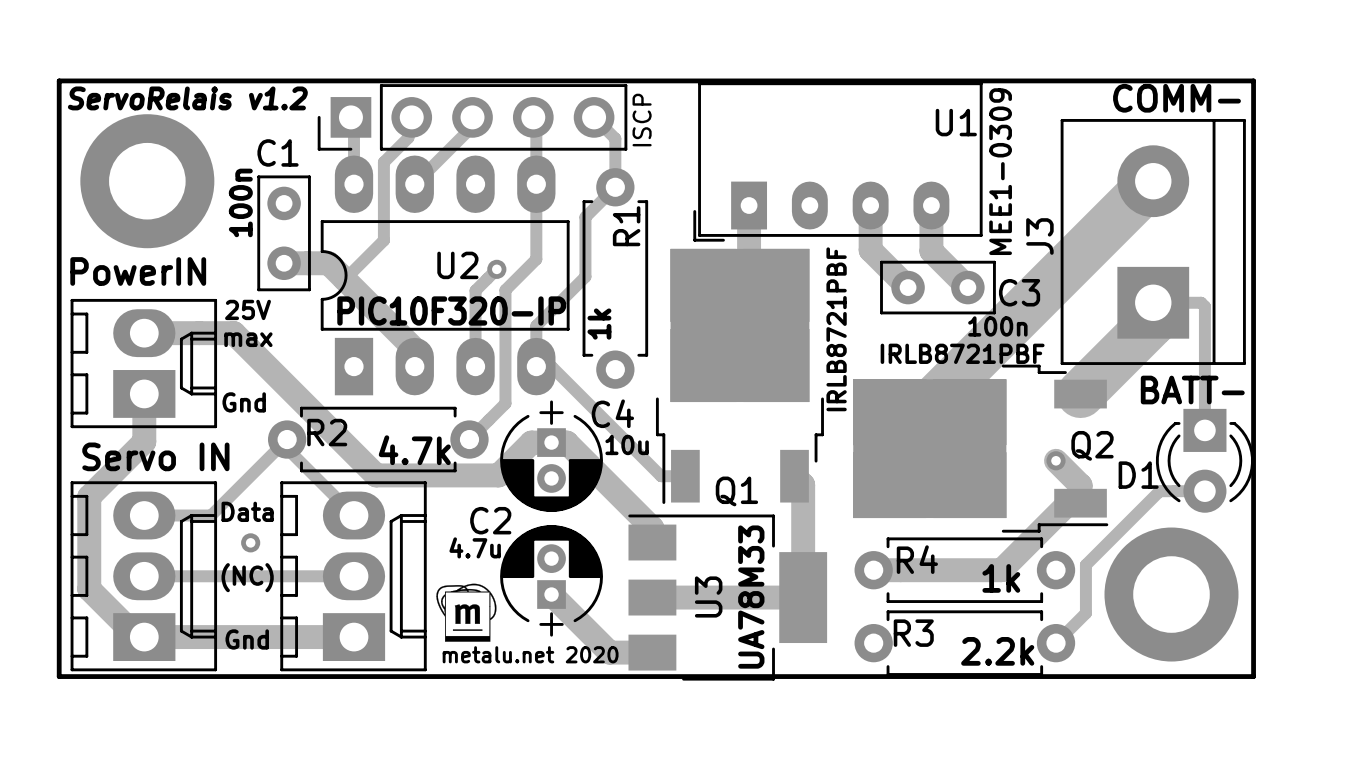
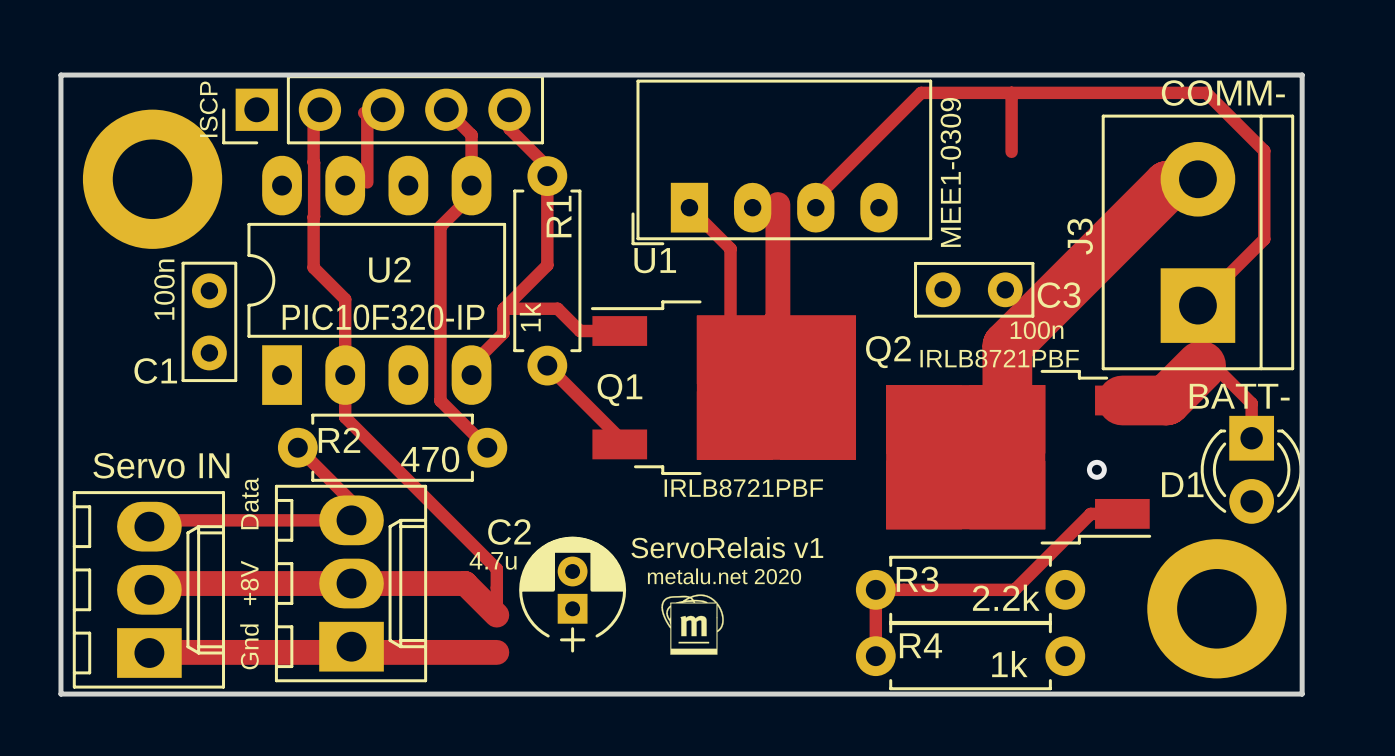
text: ServoRelais v1.2 (187, 98) -> none
track: none -> (1011, 92) (1011, 151)
track: none -> (319, 109) (313, 116) (313, 267) (345, 299) (345, 417) (496, 568) (496, 615) (465, 583) (155, 583)
track: none -> (509, 109) (509, 128) (547, 166) (547, 265) (503, 308) (557, 308) (579, 331) (619, 331)
track: (411, 117) (408, 120) (408, 137) (383, 162) (383, 240) (344, 279) -> none
track: (472, 117) (472, 126) (414, 184) -> none
part position: (472, 117) -> (383, 109)
track: (533, 117) (536, 120) (536, 259) (505, 290) (505, 403) (469, 439) -> (446, 109) (471, 135) (471, 195) (440, 226) (440, 400) (487, 447)
track: (594, 117) (615, 138) (615, 187) (585, 217) (585, 276) (536, 325) (536, 366) (551, 366) (661, 476) (685, 476) -> none
part value position: ISCP (642, 120) -> ISCP (208, 109)
U1 name position: U1 (956, 122) -> U1 (655, 260)
C1 name position: C1 (278, 152) -> C1 (155, 370)
U1 position: (837, 161) -> (781, 162)
track: (1153, 181) (929, 404) (929, 448) -> none
track: none -> (1201, 185) (1167, 185) (1007, 346) (1007, 419)
track: (870, 205) (870, 250) (908, 287) -> none
track: (931, 205) (931, 251) (967, 287) -> none
track: none -> (689, 207) (730, 248) (730, 341) (776, 387)
track: none -> (815, 207) (815, 198) (921, 92) (1206, 92) (1264, 150) (1264, 239) (1197, 305)
C1 position: (284, 233) -> (209, 321)
track: (284, 263) (328, 263) (414, 349) (414, 366) -> none
track: (496, 269) (475, 290) (475, 366) -> none
via: (496, 269) -> none
U2 position: (445, 275) -> (376, 280)
R1 position: (615, 278) -> (547, 270)
track: none -> (503, 309) (503, 333) (471, 365) (471, 375)
text: 25V (248, 309) -> none
track: (144, 333) (233, 333) (376, 475) (498, 475) (531, 442) (566, 442) (652, 528) (652, 542) -> none
text: max (248, 339) -> none
track: none -> (547, 365) (619, 438) (619, 444)
part: PowerIN (143, 363) -> none
Q1 rotation: 0° (739, 376) -> 90° clockwise (723, 387)
track: (144, 393) (144, 441) (89, 496) (89, 589) (137, 637) (353, 637) -> none
track: (1080, 394) (1153, 321) (1153, 302) (1201, 302) (1204, 306) (1204, 396) -> (1122, 400) (1166, 400) (1201, 365) (1213, 365) (1251, 403)
text: Gnd (244, 402) -> none
track: none -> (297, 447) (351, 501) (351, 520) (155, 520)
Q2 name position: Q2 (1092, 445) -> Q2 (888, 352)
R2 value: 4.7k (414, 450) -> 470 (430, 459)
C4: 10u (551, 456) -> none
track: (1056, 460) (1080, 485) (1080, 503) -> none
track: (794, 476) (803, 484) (803, 597) (652, 597) -> none
track: (1204, 491) (1159, 491) (1085, 564) (1085, 613) (1056, 643) -> none
track: (1068, 503) (1001, 570) (873, 570) -> (1109, 513) (1090, 513) (1014, 589) (875, 589) (875, 656)
text rotation: 0° (247, 511) -> 90° counterclockwise (249, 503)
track: (144, 515) (211, 515) (287, 439) (287, 448) (353, 515) -> none
text: none -> ServoRelais v1 (727, 547)
via: (250, 542) -> none
R4 position: (964, 570) -> (970, 656)
track: (144, 576) (353, 576) -> none
part position: (353, 576) -> (351, 583)
text: (NC) (247, 577) -> +8V (249, 582)
track: (551, 594) (609, 652) (652, 652) -> none
U3: UA78M33 (727, 597) -> none
drawing position: (466, 612) -> (692, 624)
track: none -> (155, 646) (161, 652) (496, 652)
text rotation: 0° (247, 639) -> 90° counterclockwise (249, 646)
R3 position: (964, 643) -> (970, 589)
text position: metalu.net 2020 (530, 654) -> metalu.net 2020 (724, 576)

